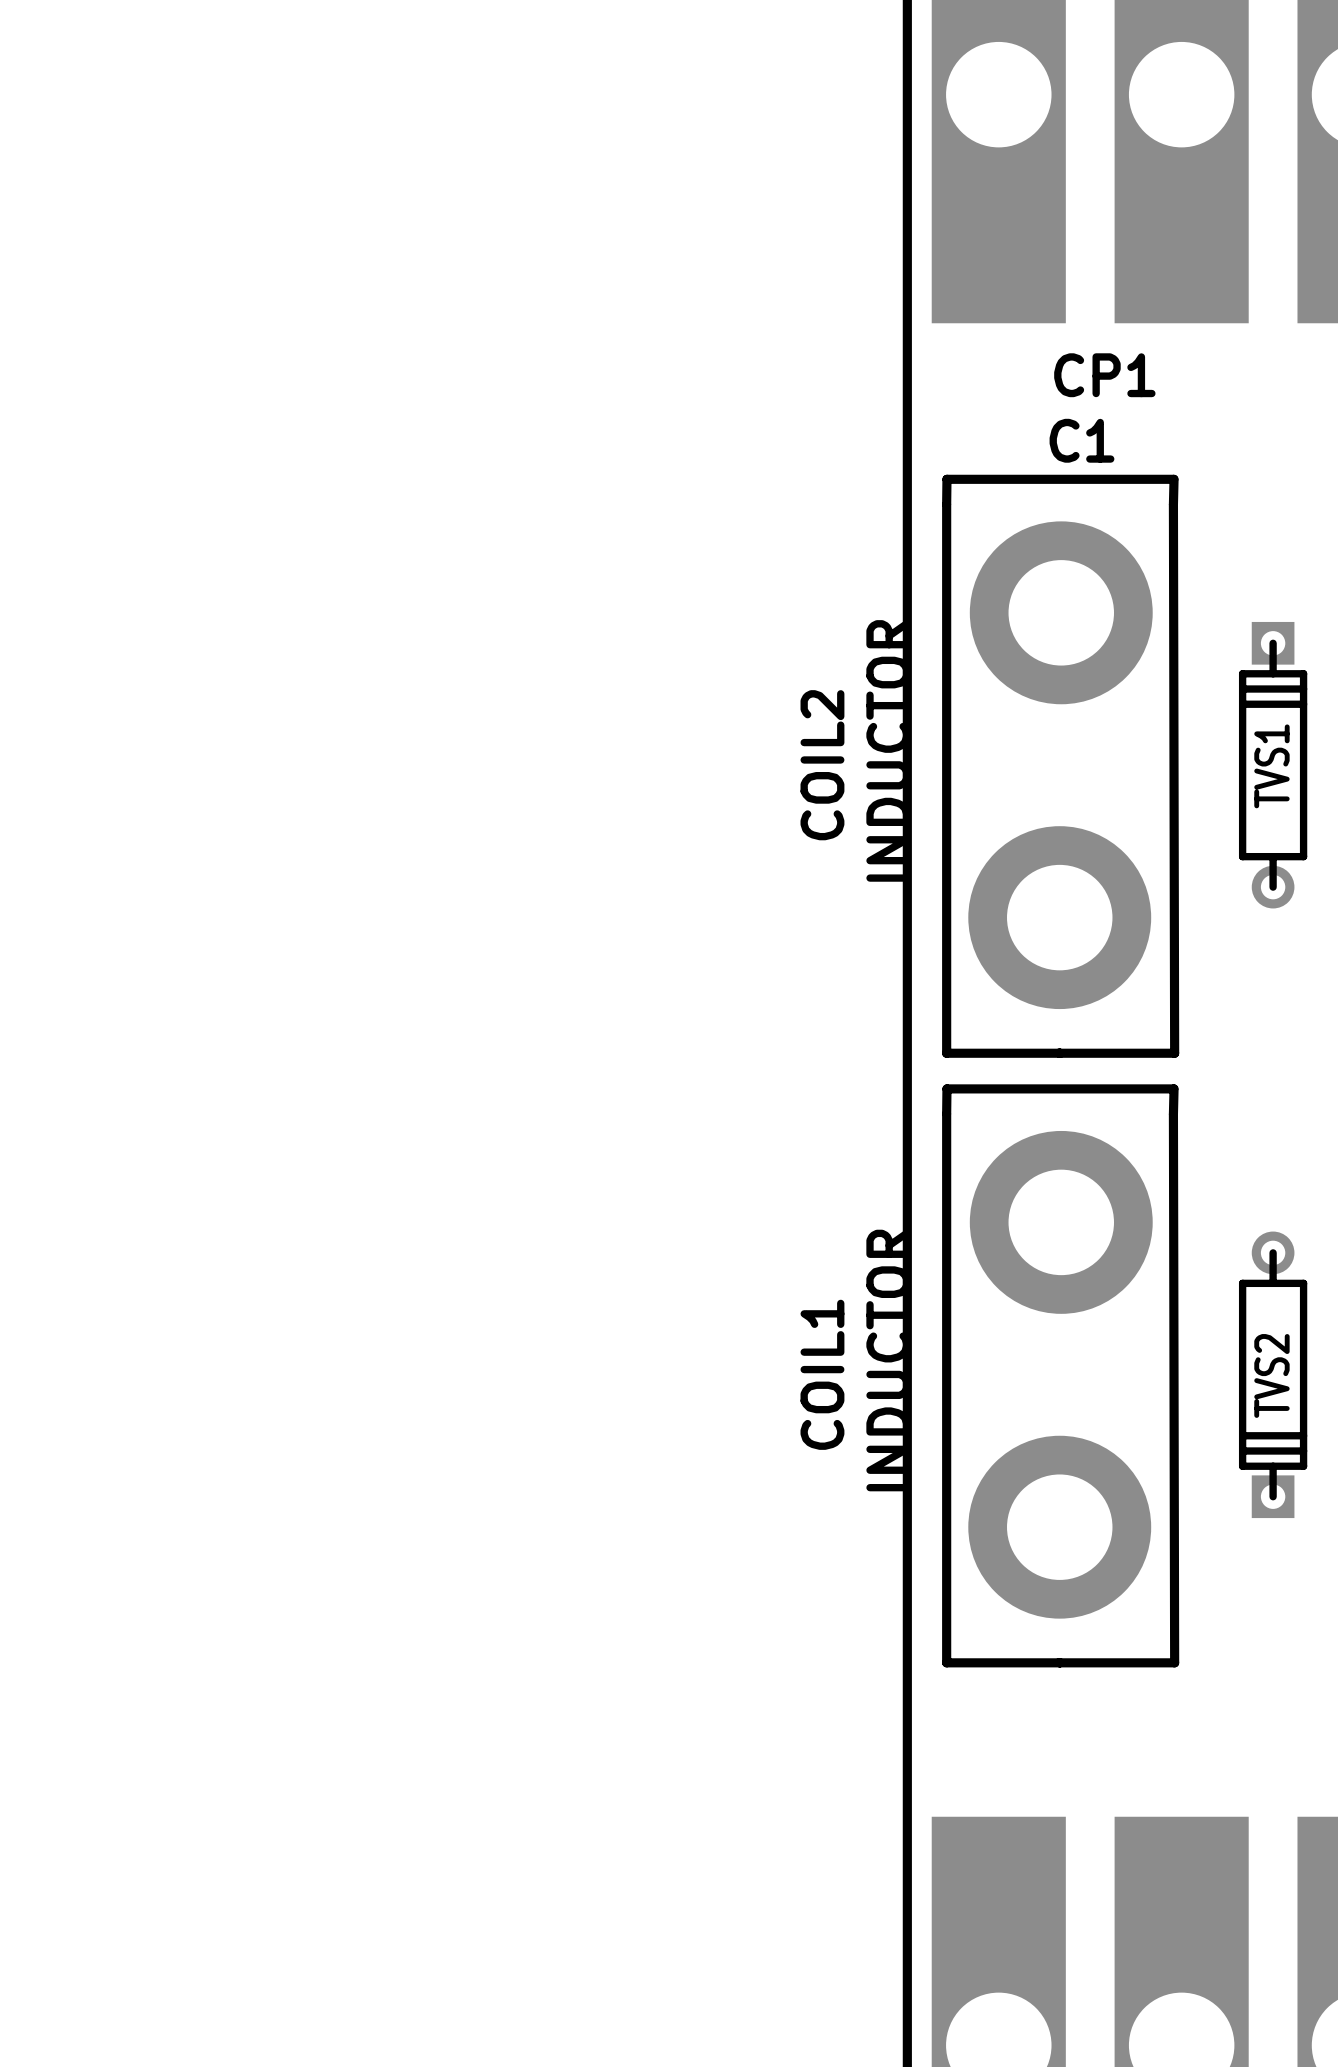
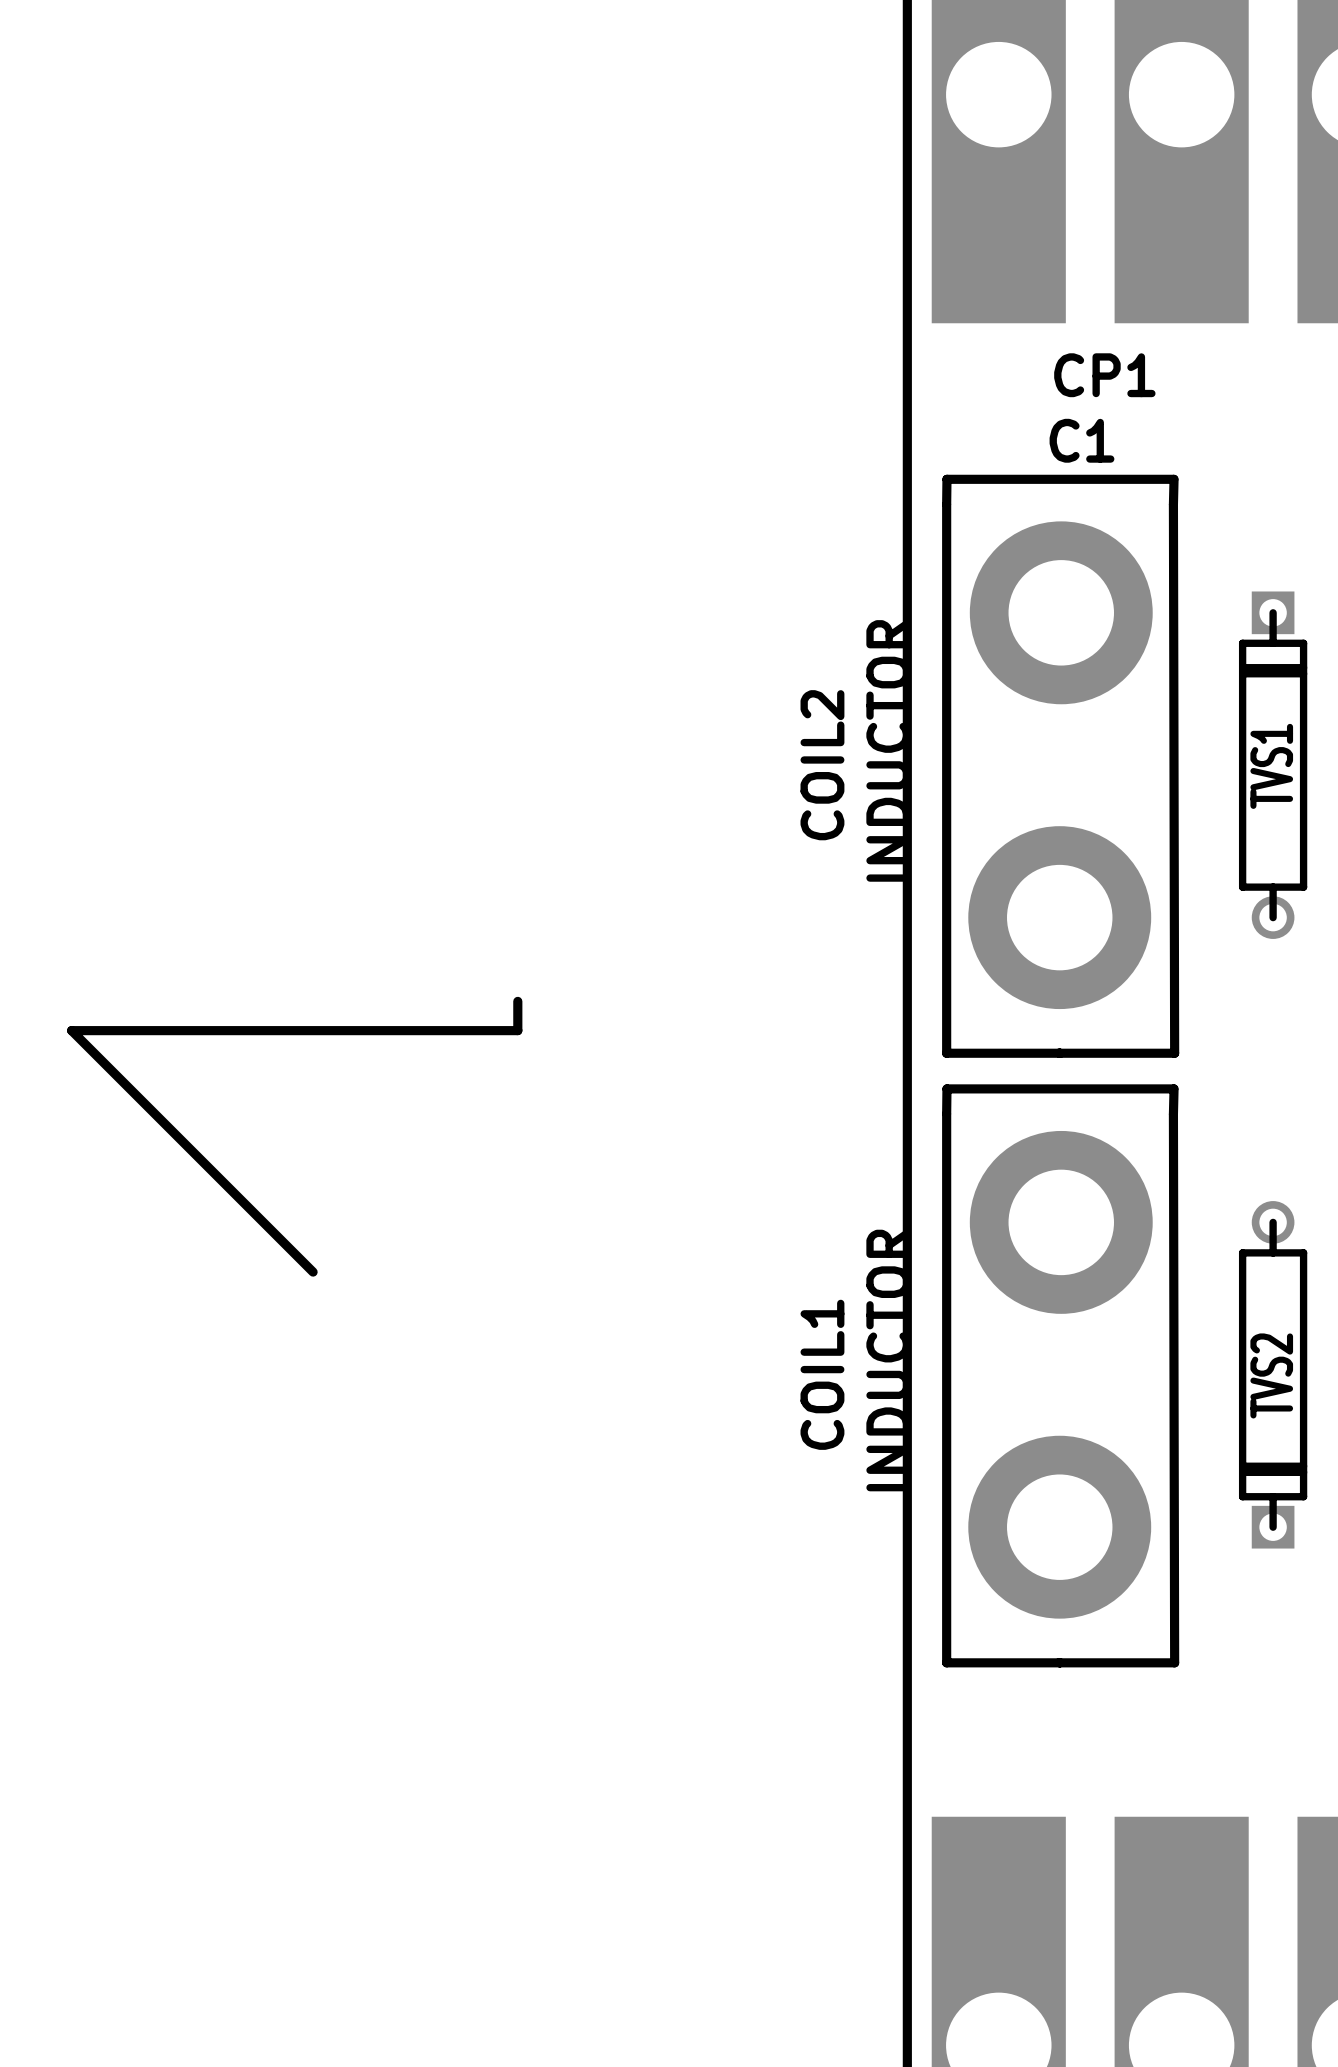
TVS1 footprint: [1238, 621, 1308, 909] -> [1238, 591, 1308, 939]
board edge: none -> (517, 1001) (517, 1030) (71, 1030) (313, 1272)
TVS2 footprint: [1238, 1231, 1308, 1519] -> [1238, 1201, 1308, 1549]

